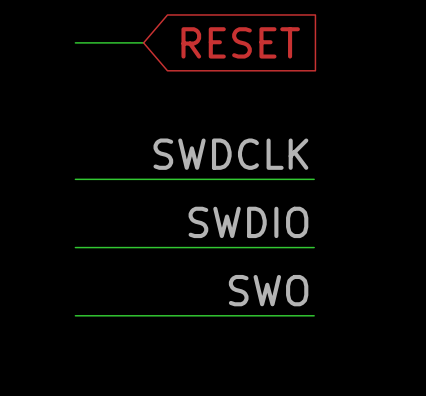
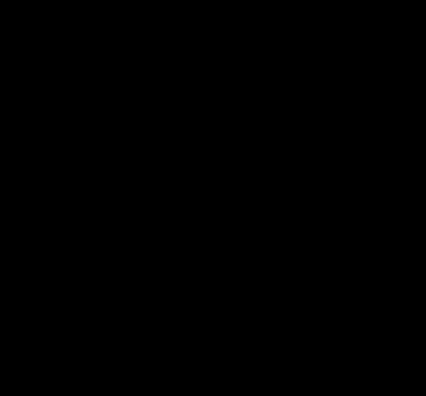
wire: (75, 42) (143, 42) -> none
global label: RESET (240, 42) -> none
label: SWDCLK (230, 154) -> none
wire: (75, 179) (314, 179) -> none
label: SWDIO (248, 222) -> none
wire: (75, 247) (314, 247) -> none
label: SWO (268, 290) -> none
wire: (75, 315) (314, 315) -> none

